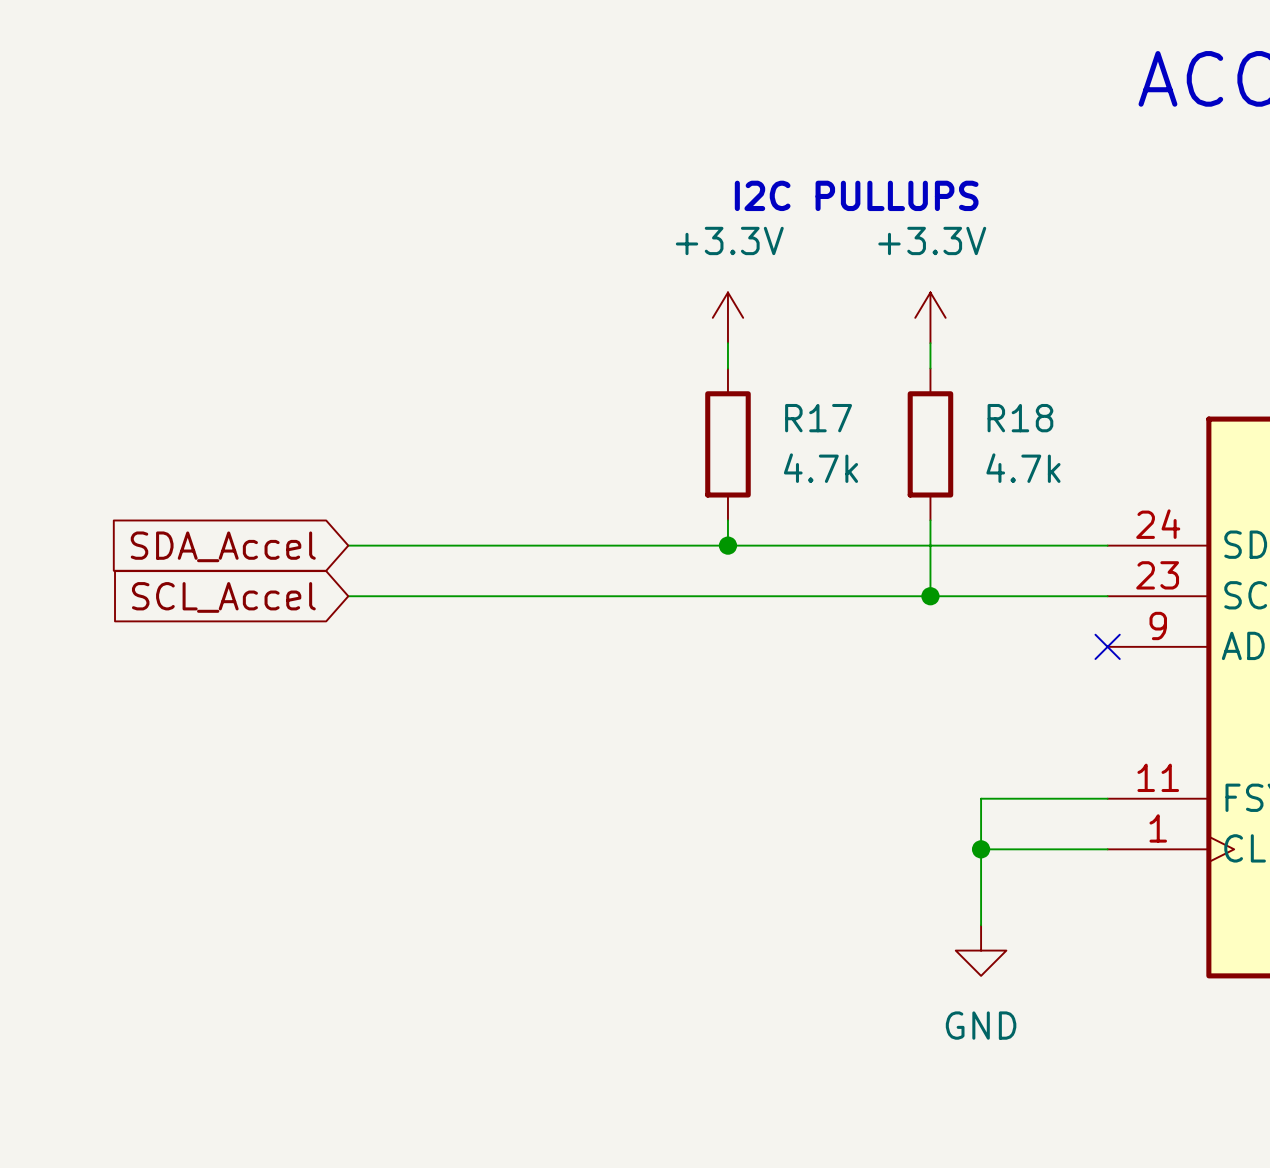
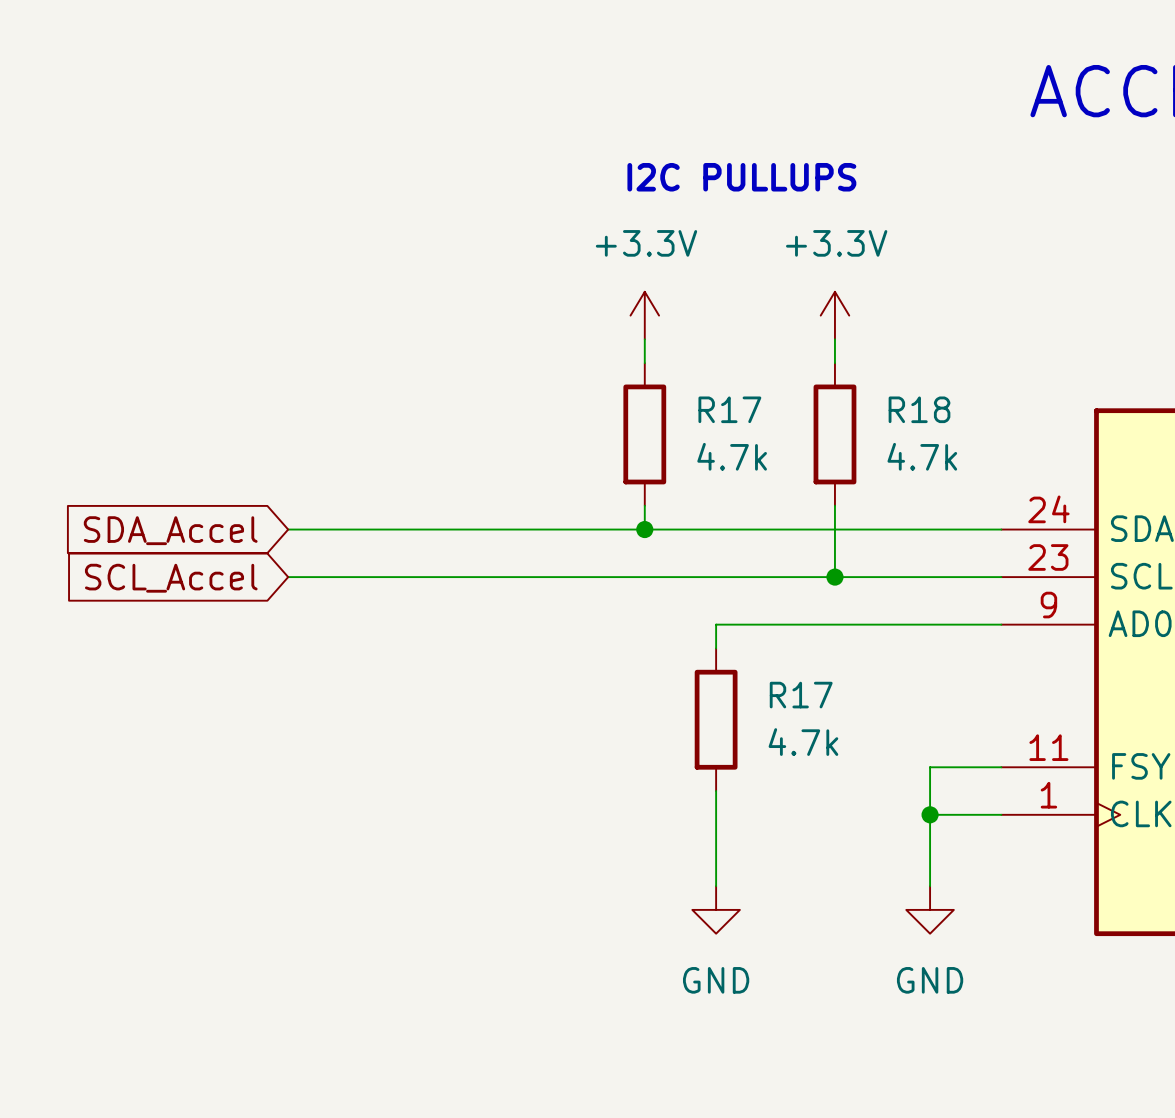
text position: I2C PULLUPS (856, 195) -> I2C PULLUPS (741, 177)
wire: none -> (1001, 624) (716, 624) (716, 648)
no-connect mark: (1107, 646) -> none
R17: none -> 4.7k (716, 719)
wire: (1031, 798) (981, 798) (981, 925) -> (930, 767) (930, 886)
wire: none -> (716, 791) (716, 886)
wire: (981, 849) (1031, 849) -> none
junction position: (981, 849) -> (930, 814)
power symbol: none -> GND (716, 909)
power symbol position: GND (981, 950) -> GND (930, 909)

